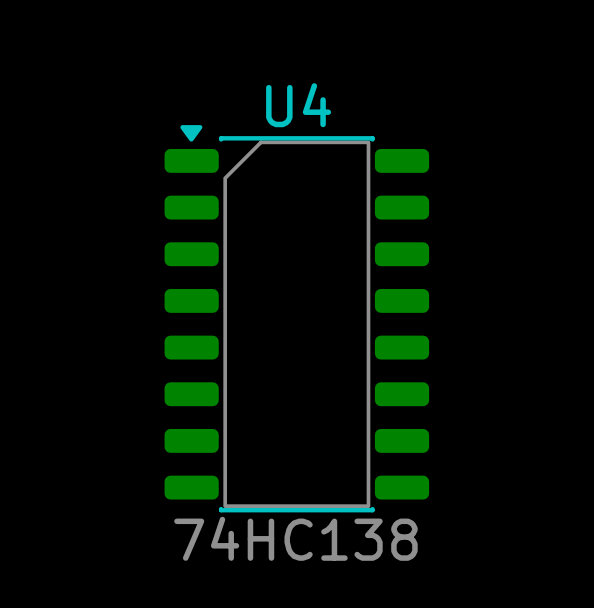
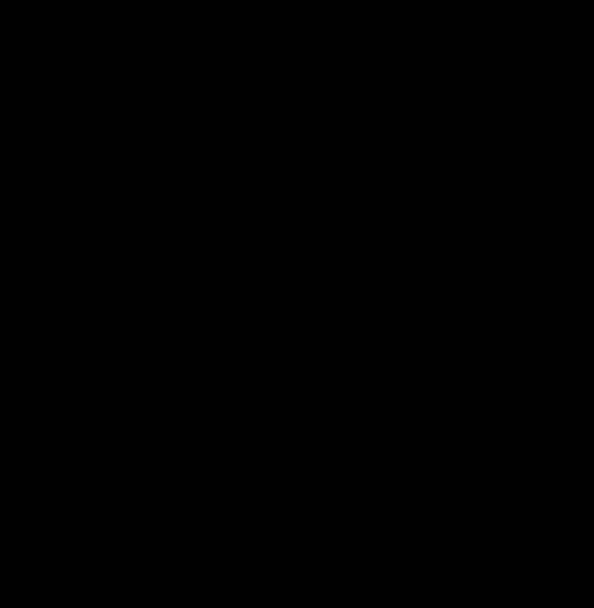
U4: 74HC138 (296, 318) -> none

